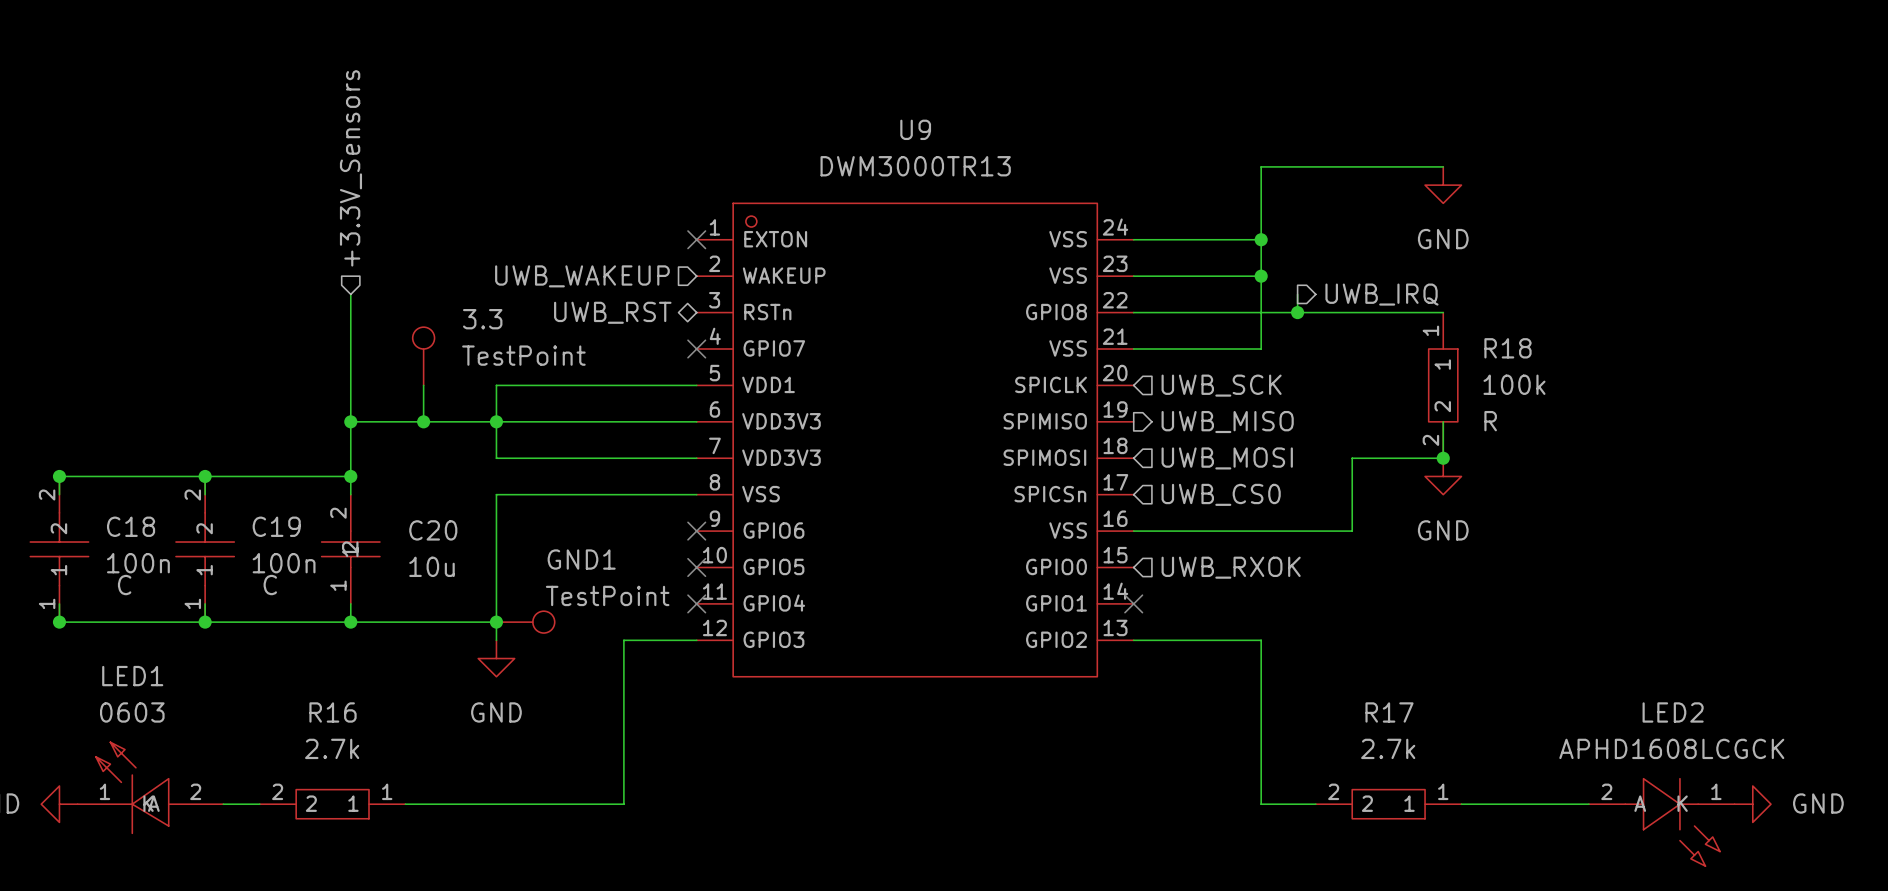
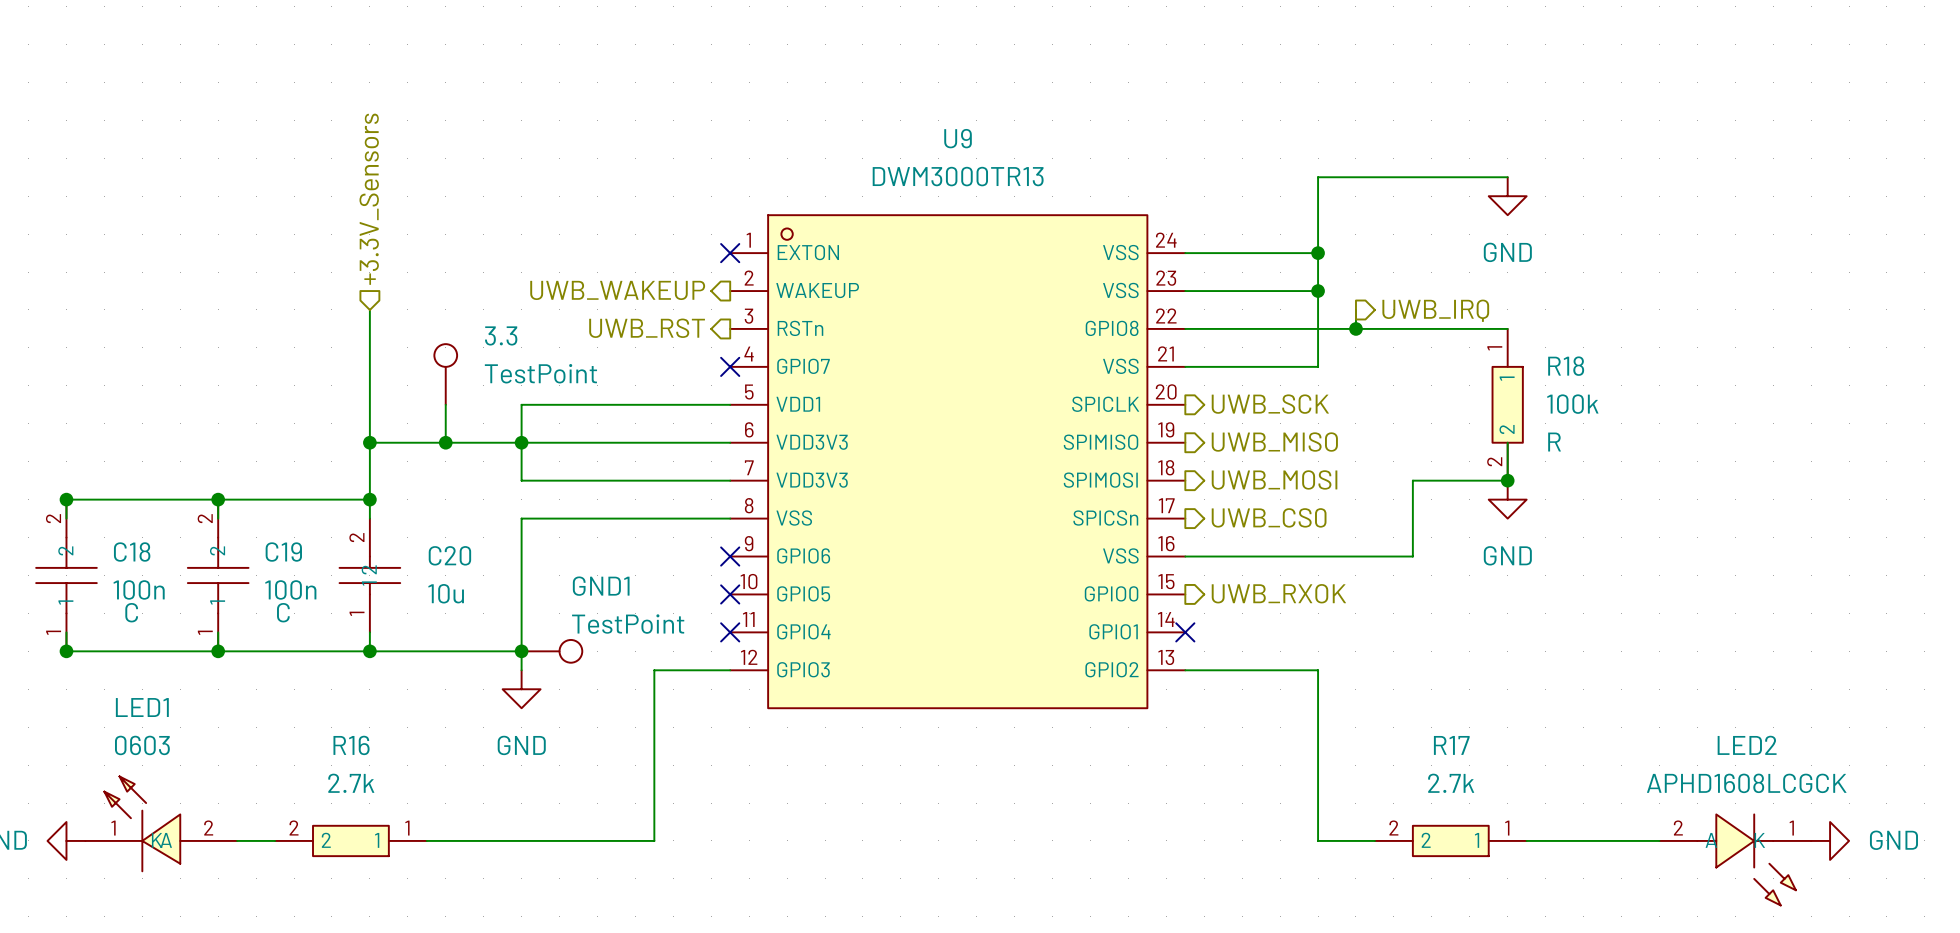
hierarchical label shape: input (582, 276) -> output (617, 290)
hierarchical label shape: bidirectional (612, 312) -> output (647, 328)
hierarchical label shape: input (1221, 385) -> output (1270, 404)
hierarchical label shape: input (1227, 458) -> output (1274, 479)
hierarchical label shape: input (1221, 494) -> output (1269, 517)
hierarchical label shape: input (1231, 567) -> output (1278, 593)

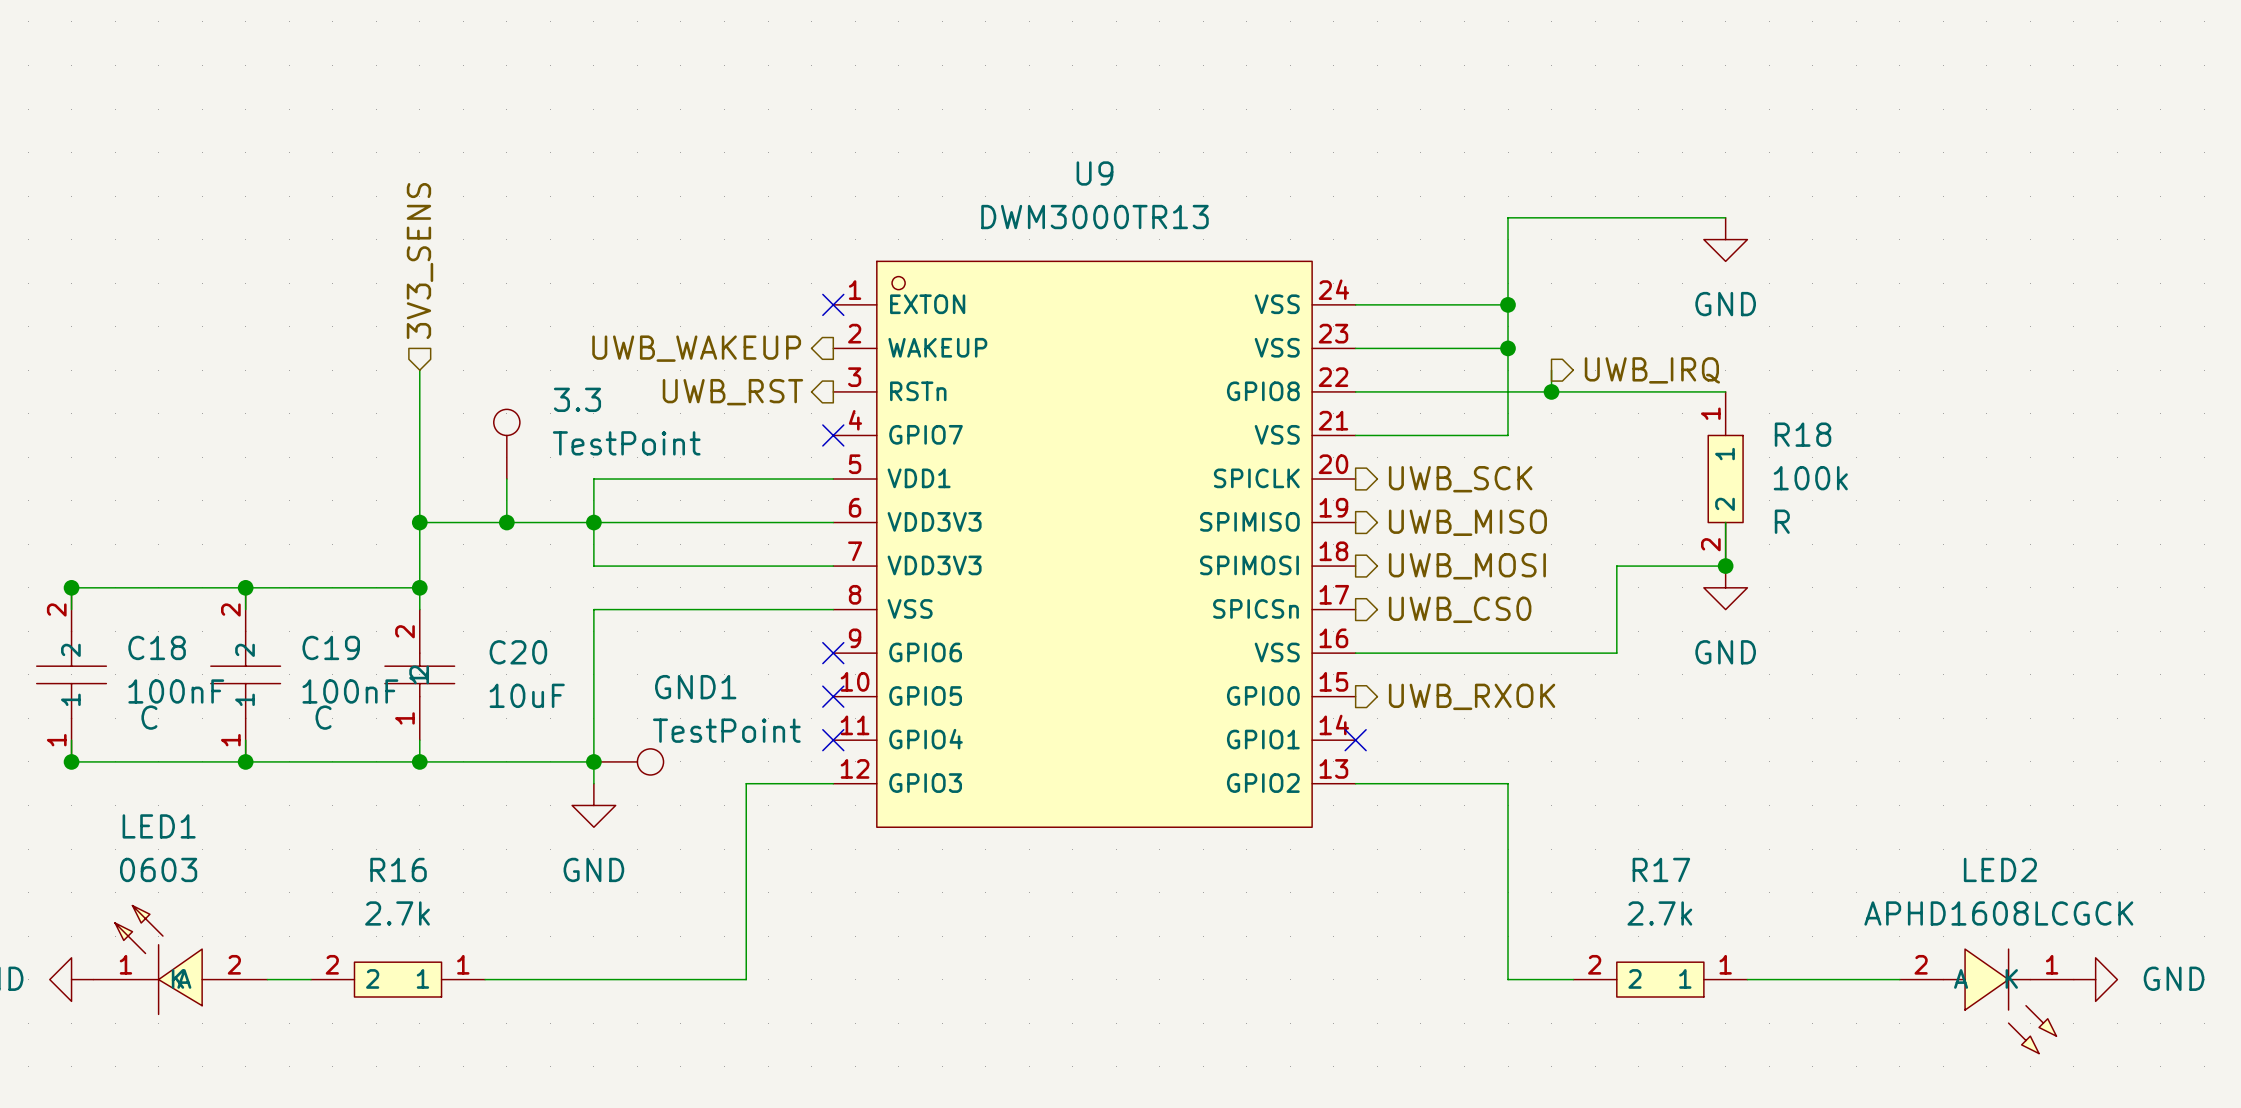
hierarchical label: +3.3V_Sensors (369, 199) -> 3V3_SENS (420, 261)
C18 value: 100n (139, 589) -> 100nF (176, 691)
C19 value: 100n (290, 589) -> 100nF (350, 691)
C20 value: 10u (446, 593) -> 10uF (527, 695)

